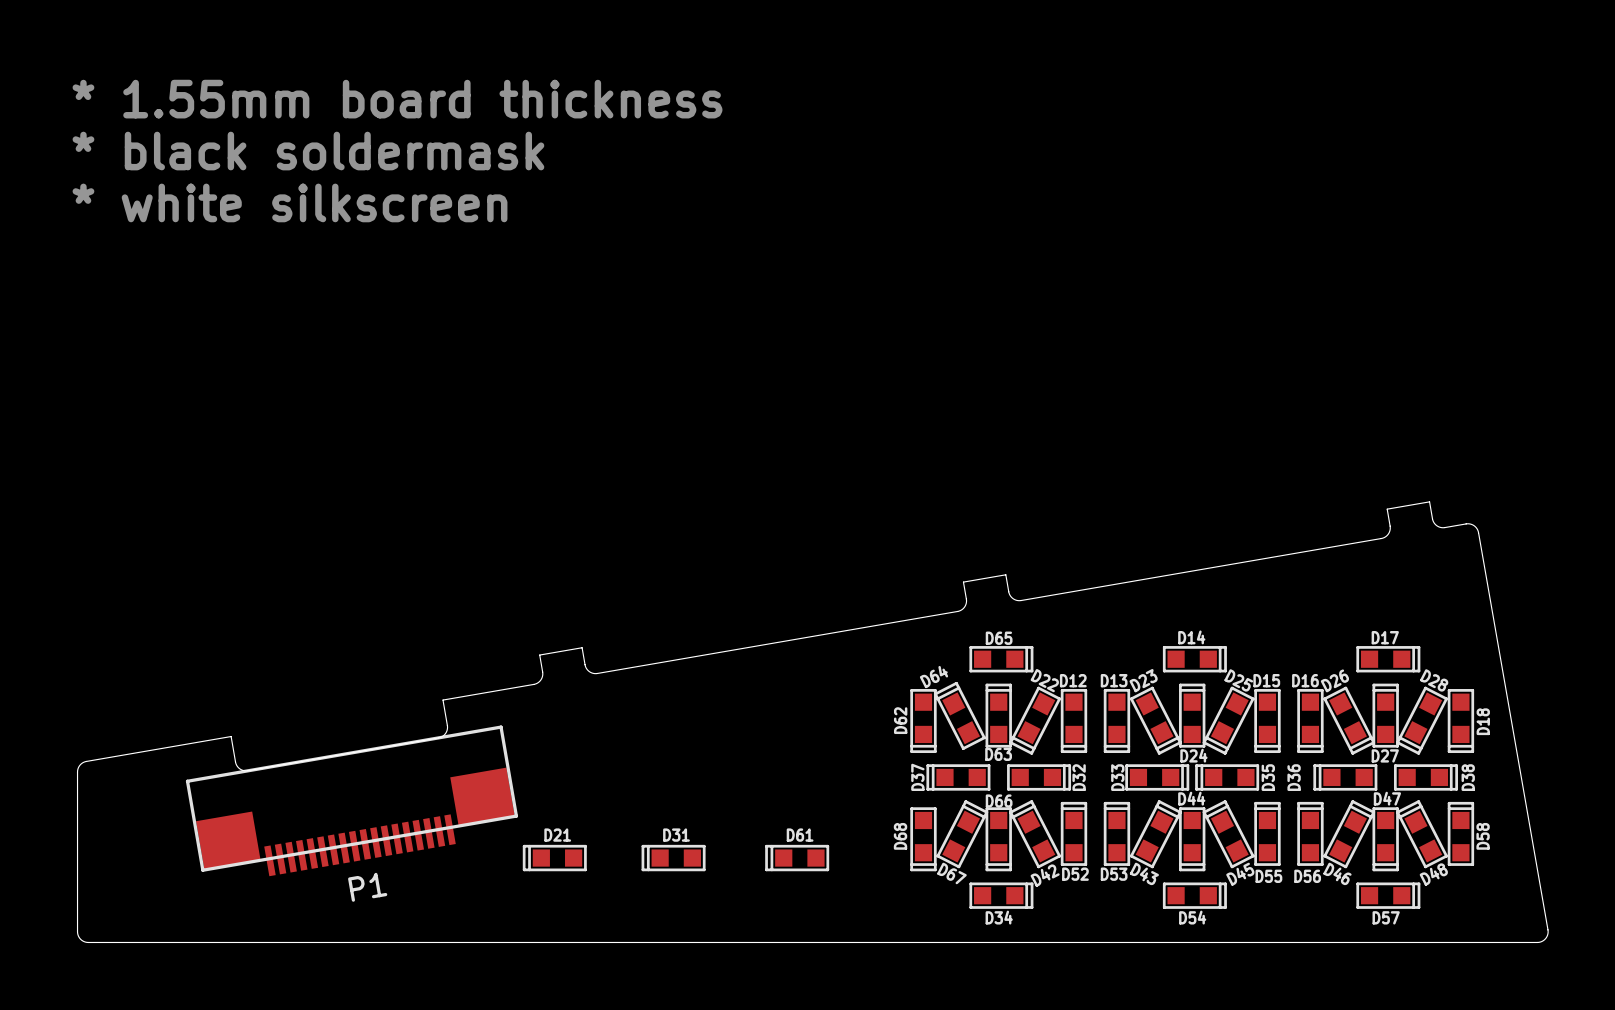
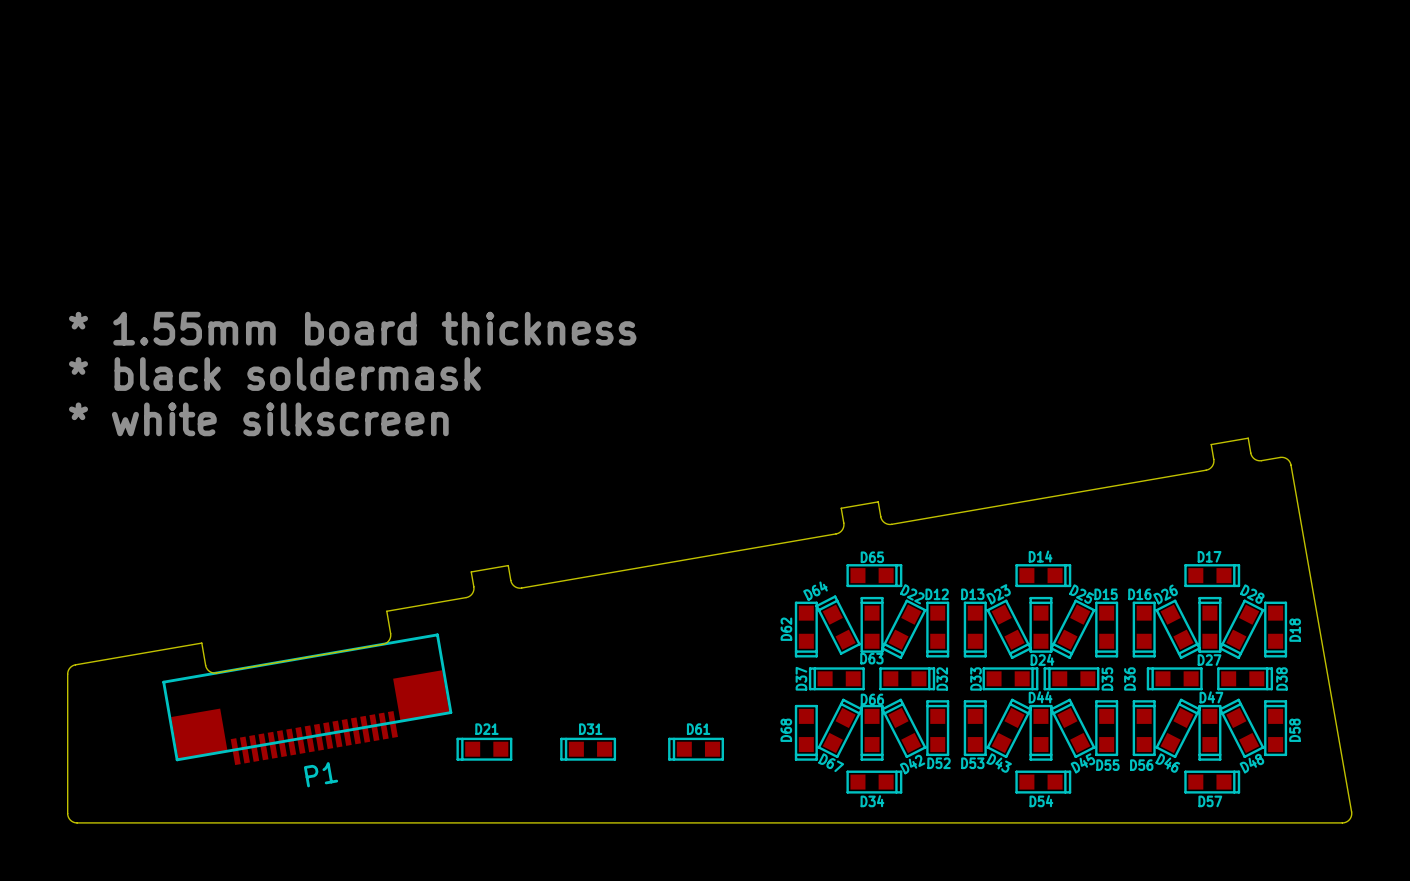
text position: * 1.55mm board thickness (397, 99) -> * 1.55mm board thickness (352, 328)
text position: * black soldermask (308, 151) -> * black soldermask (274, 374)
text position: * white silkscreen (290, 202) -> * white silkscreen (258, 419)

